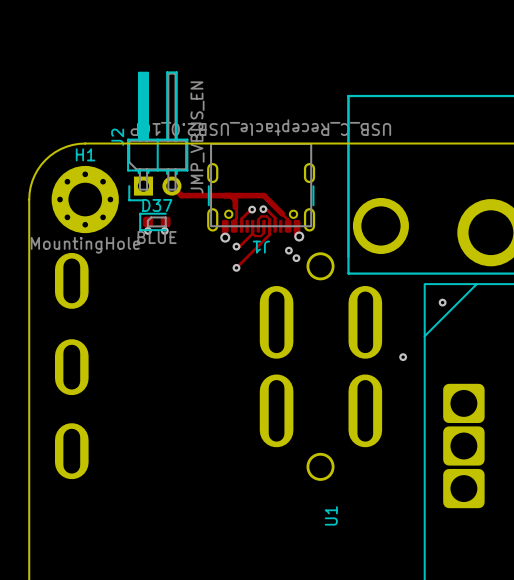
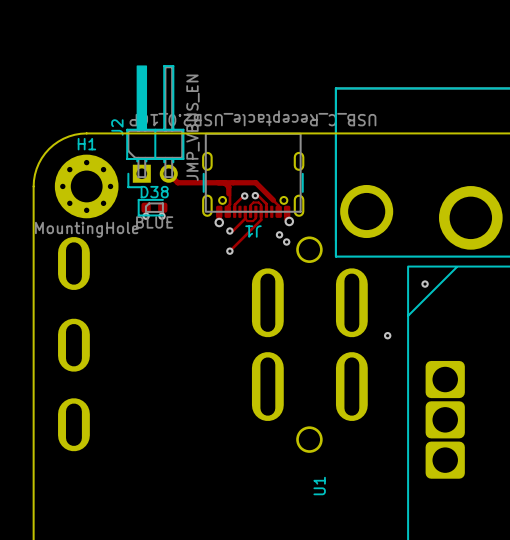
D37 name: D37 (157, 205) -> D38 (154, 192)

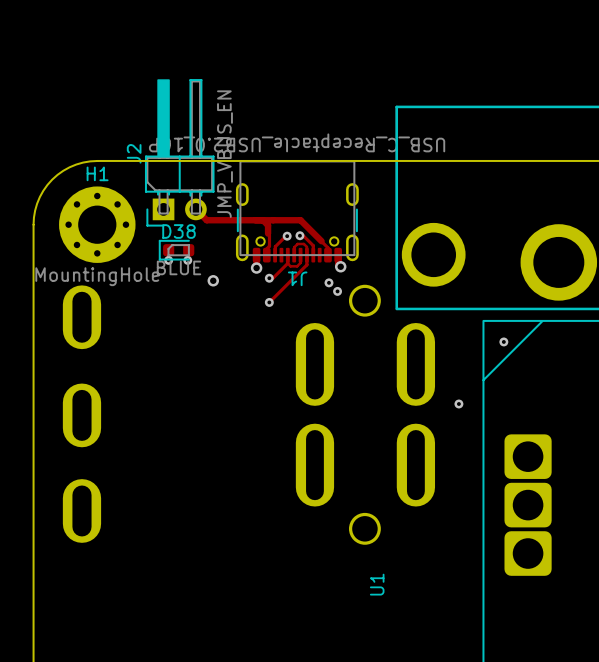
via: none -> (213, 280)

